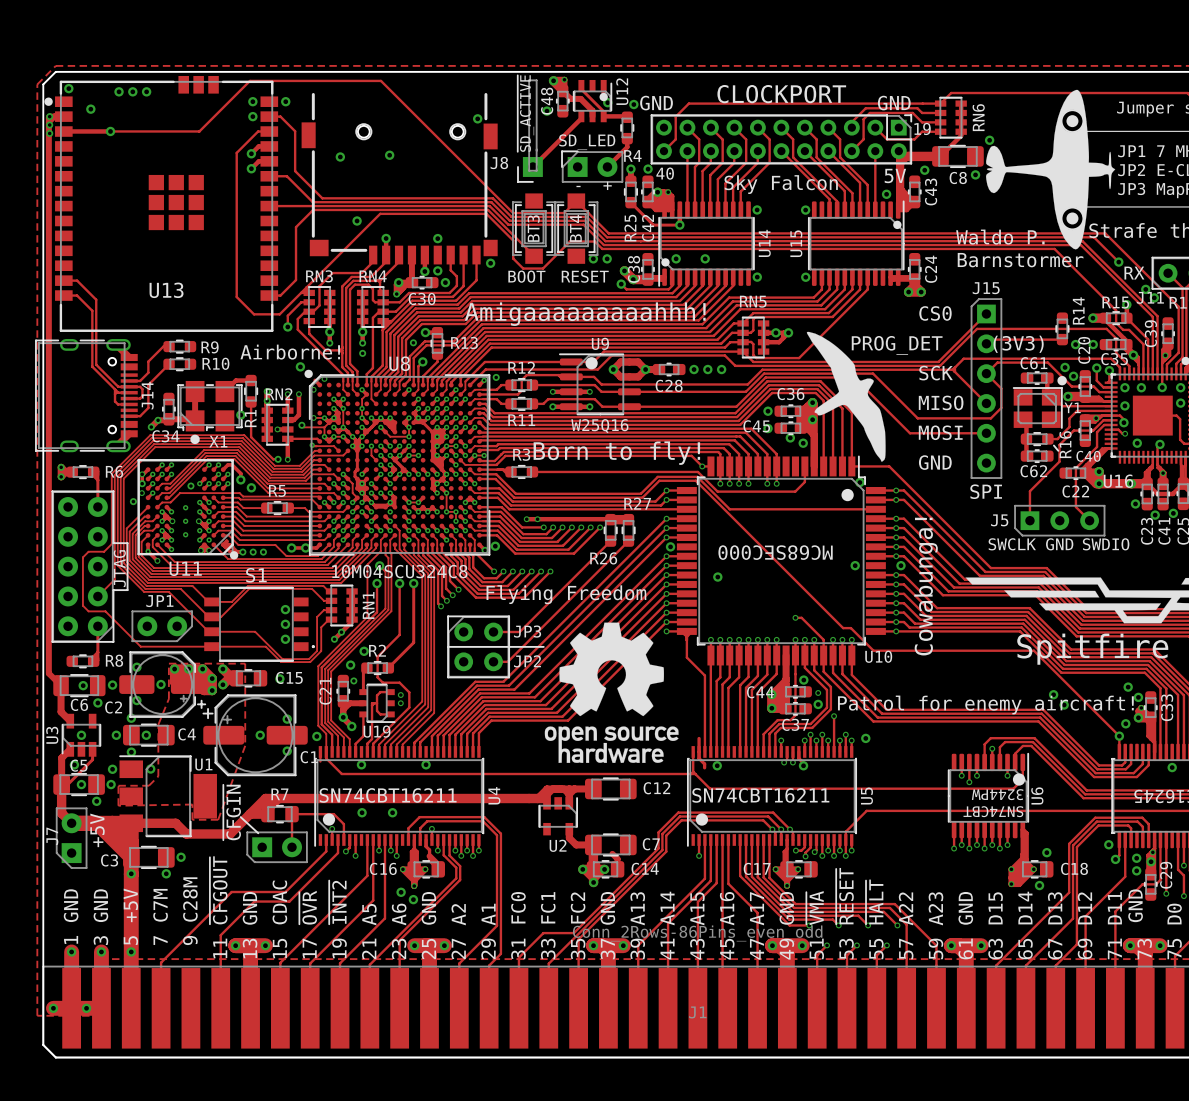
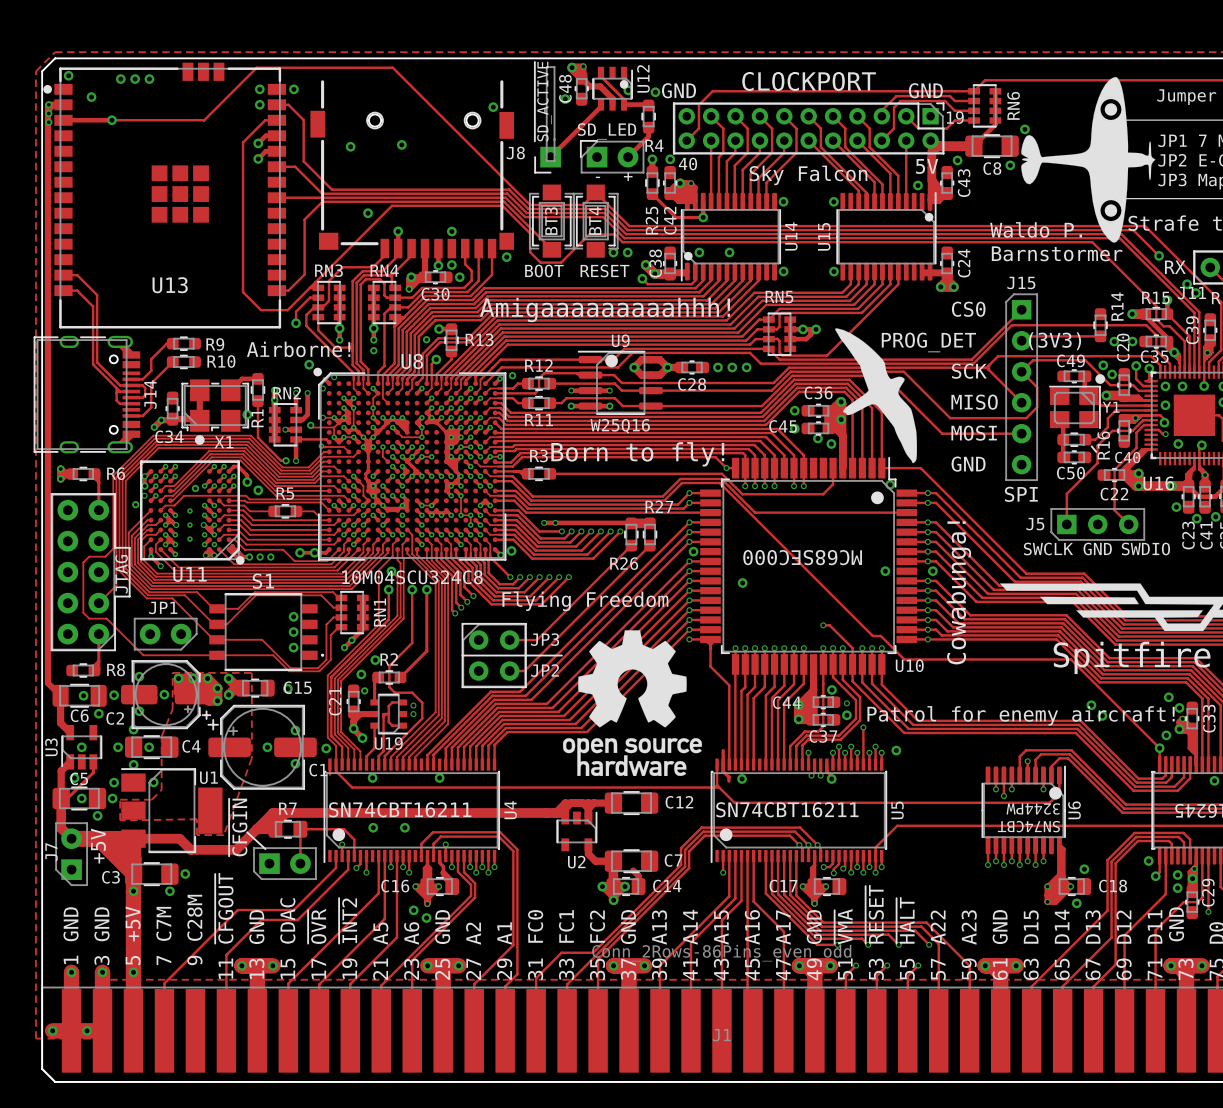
C61 name: C61 (1033, 363) -> C49 (1070, 360)
C62 name: C62 (1033, 471) -> C50 (1070, 473)

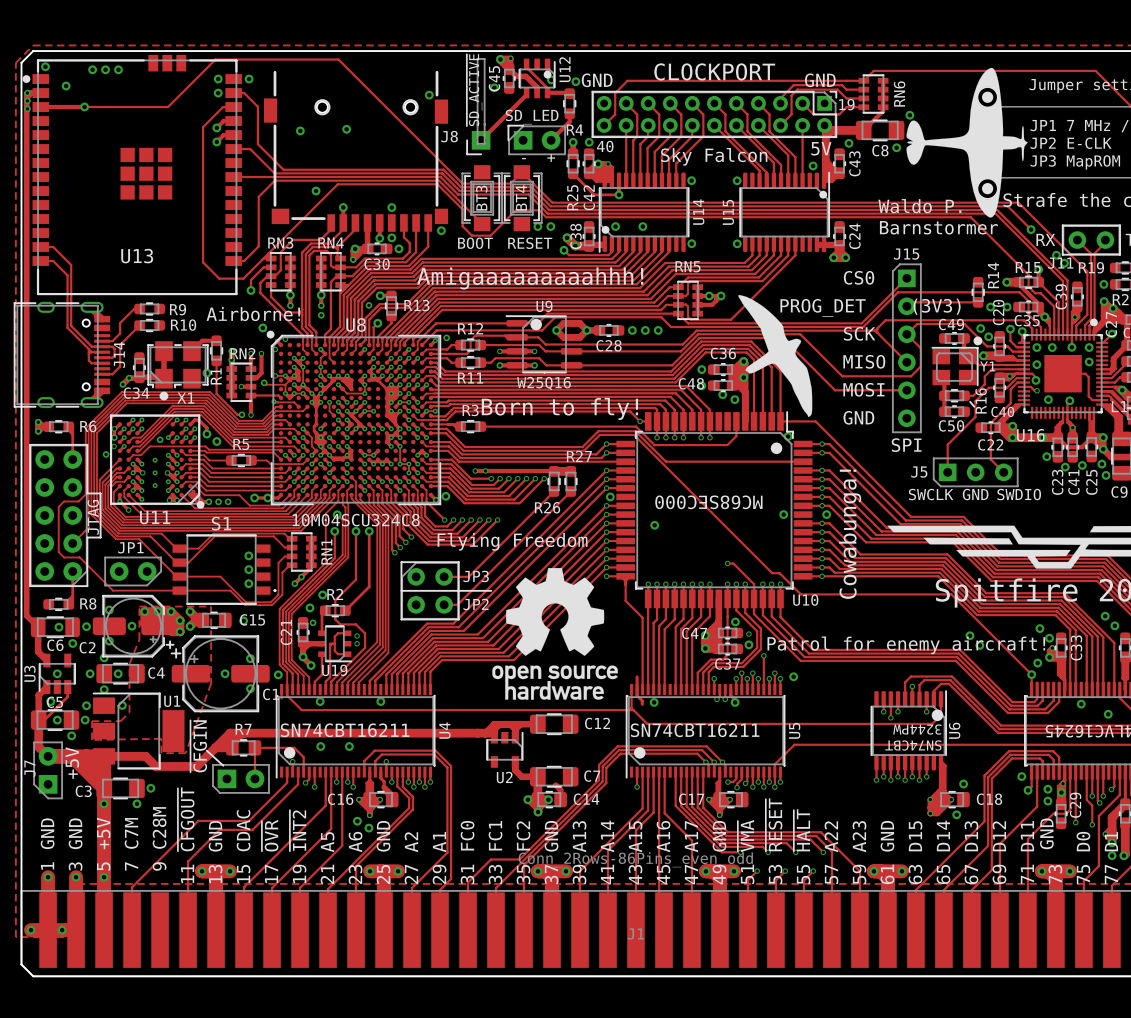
C48 name: C48 (565, 88) -> C45 (494, 78)
C45 name: C45 (783, 426) -> C48 (691, 383)
C44 name: C44 (787, 702) -> C47 (694, 633)

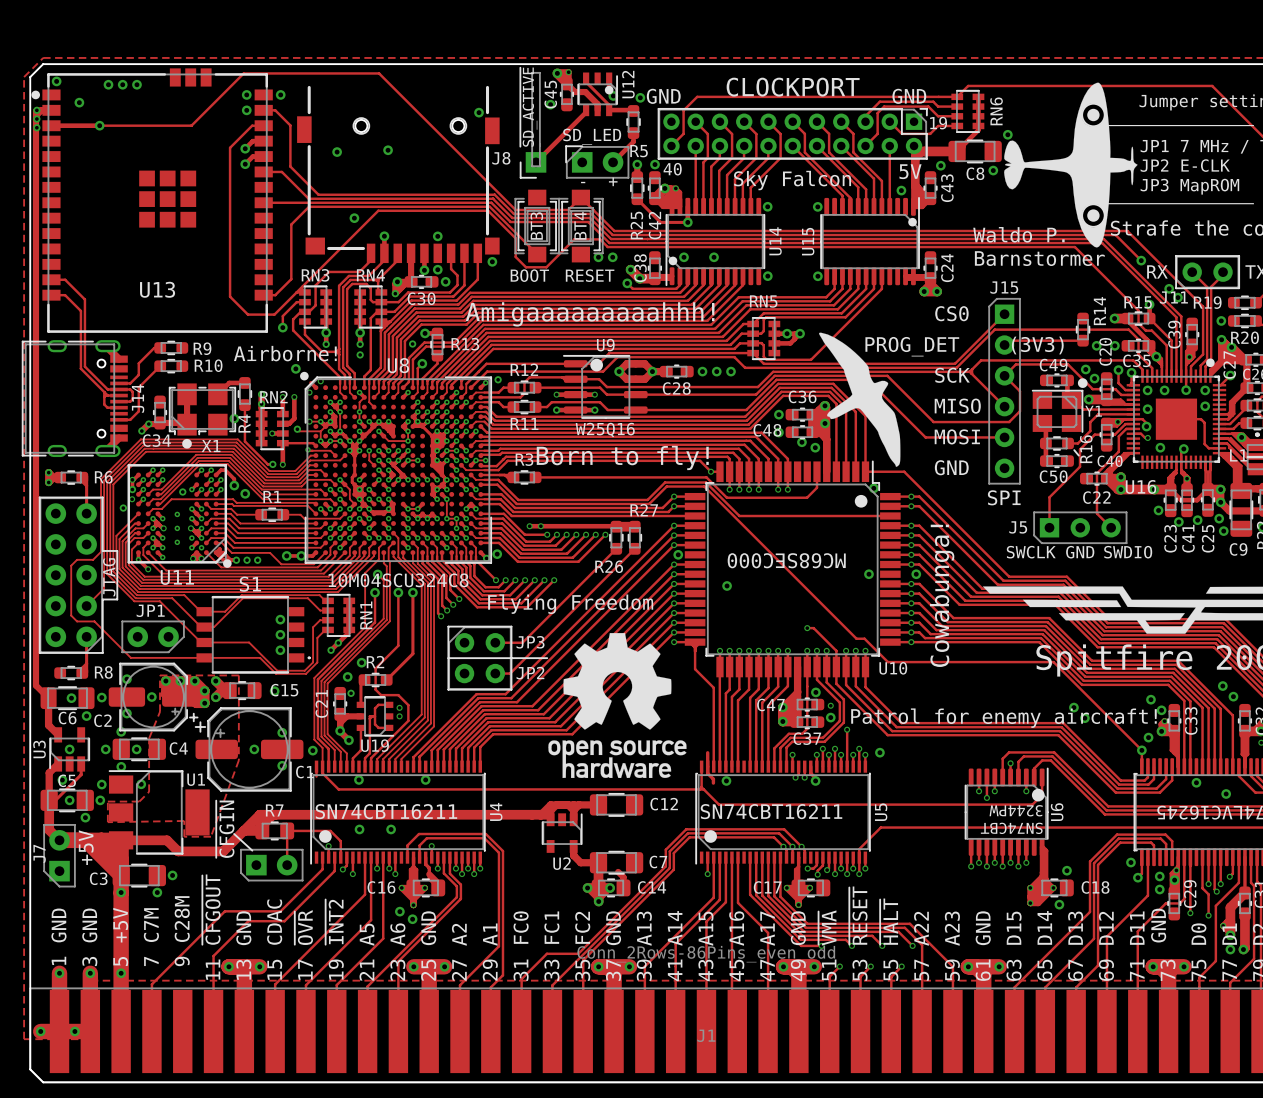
R4 name: R4 (574, 129) -> R5 (639, 151)
R1 name: R1 (216, 376) -> R4 (244, 423)
R5 name: R5 (241, 444) -> R1 (272, 496)

